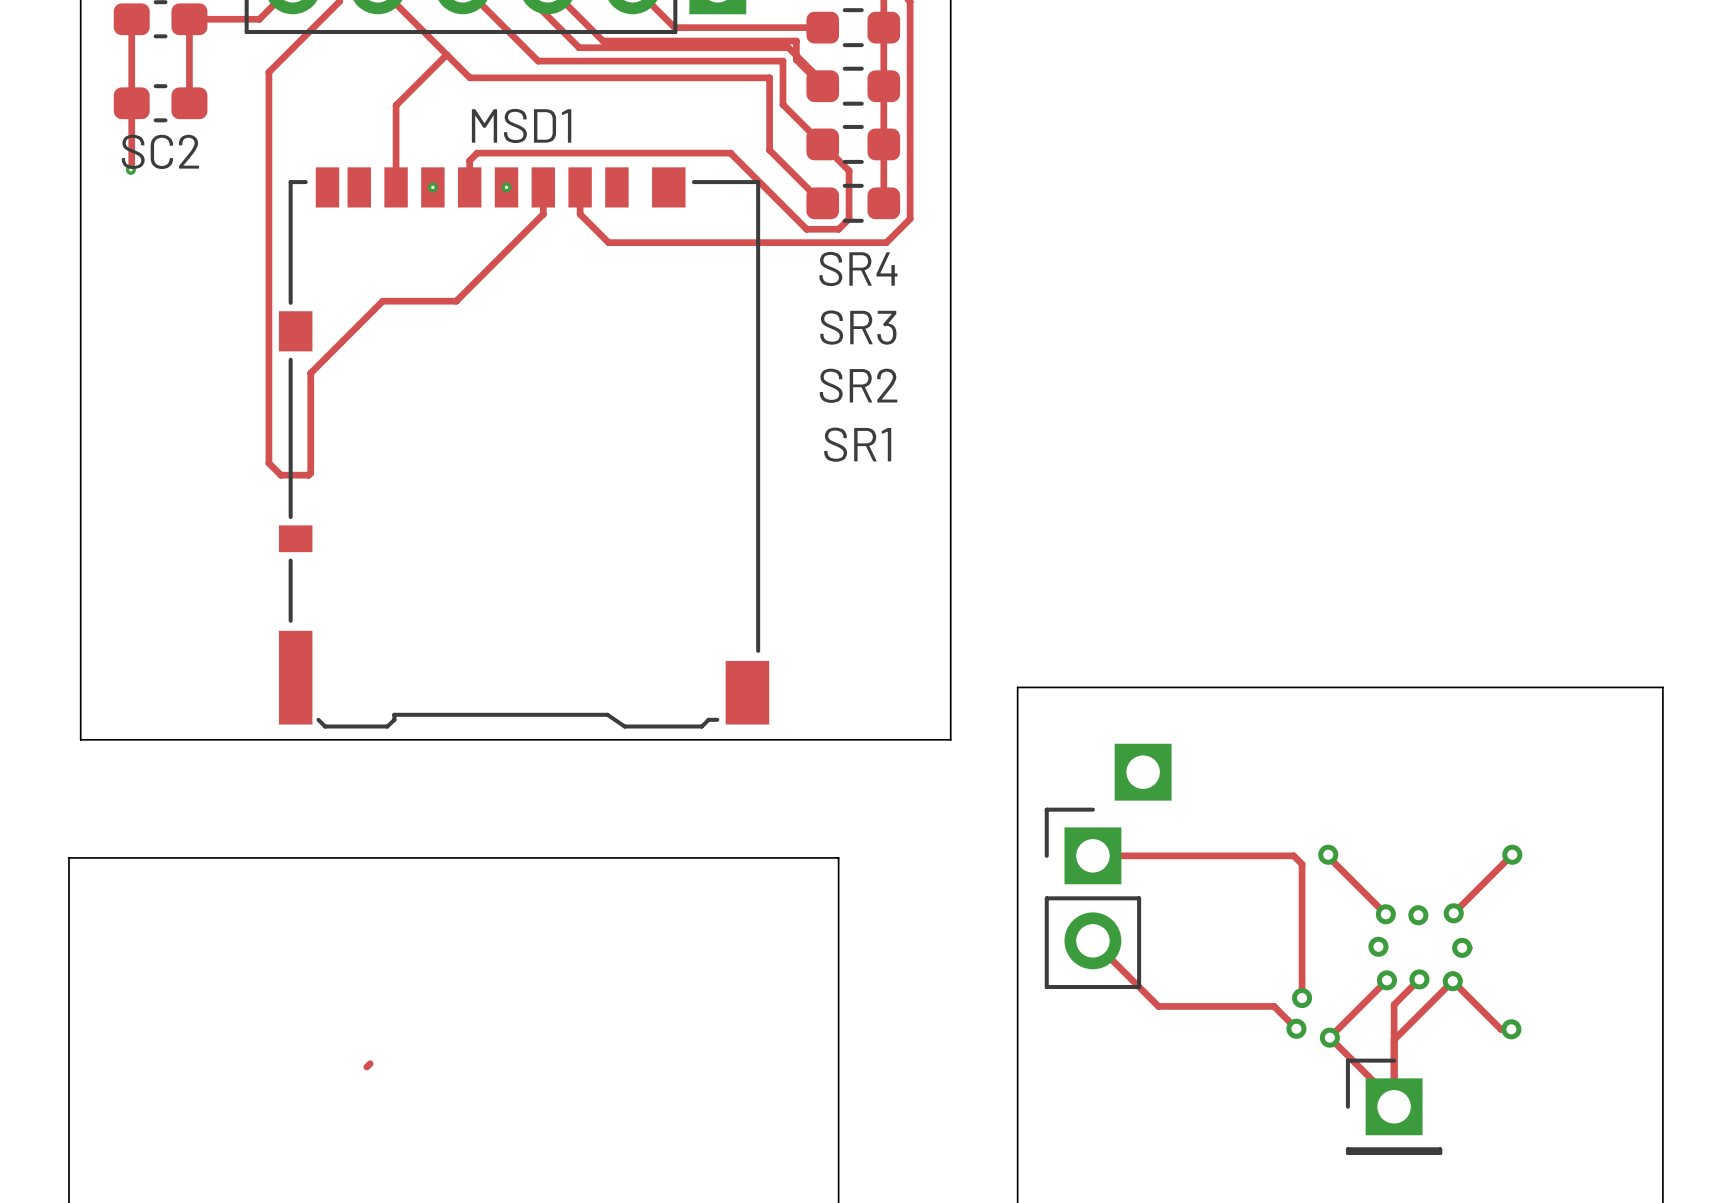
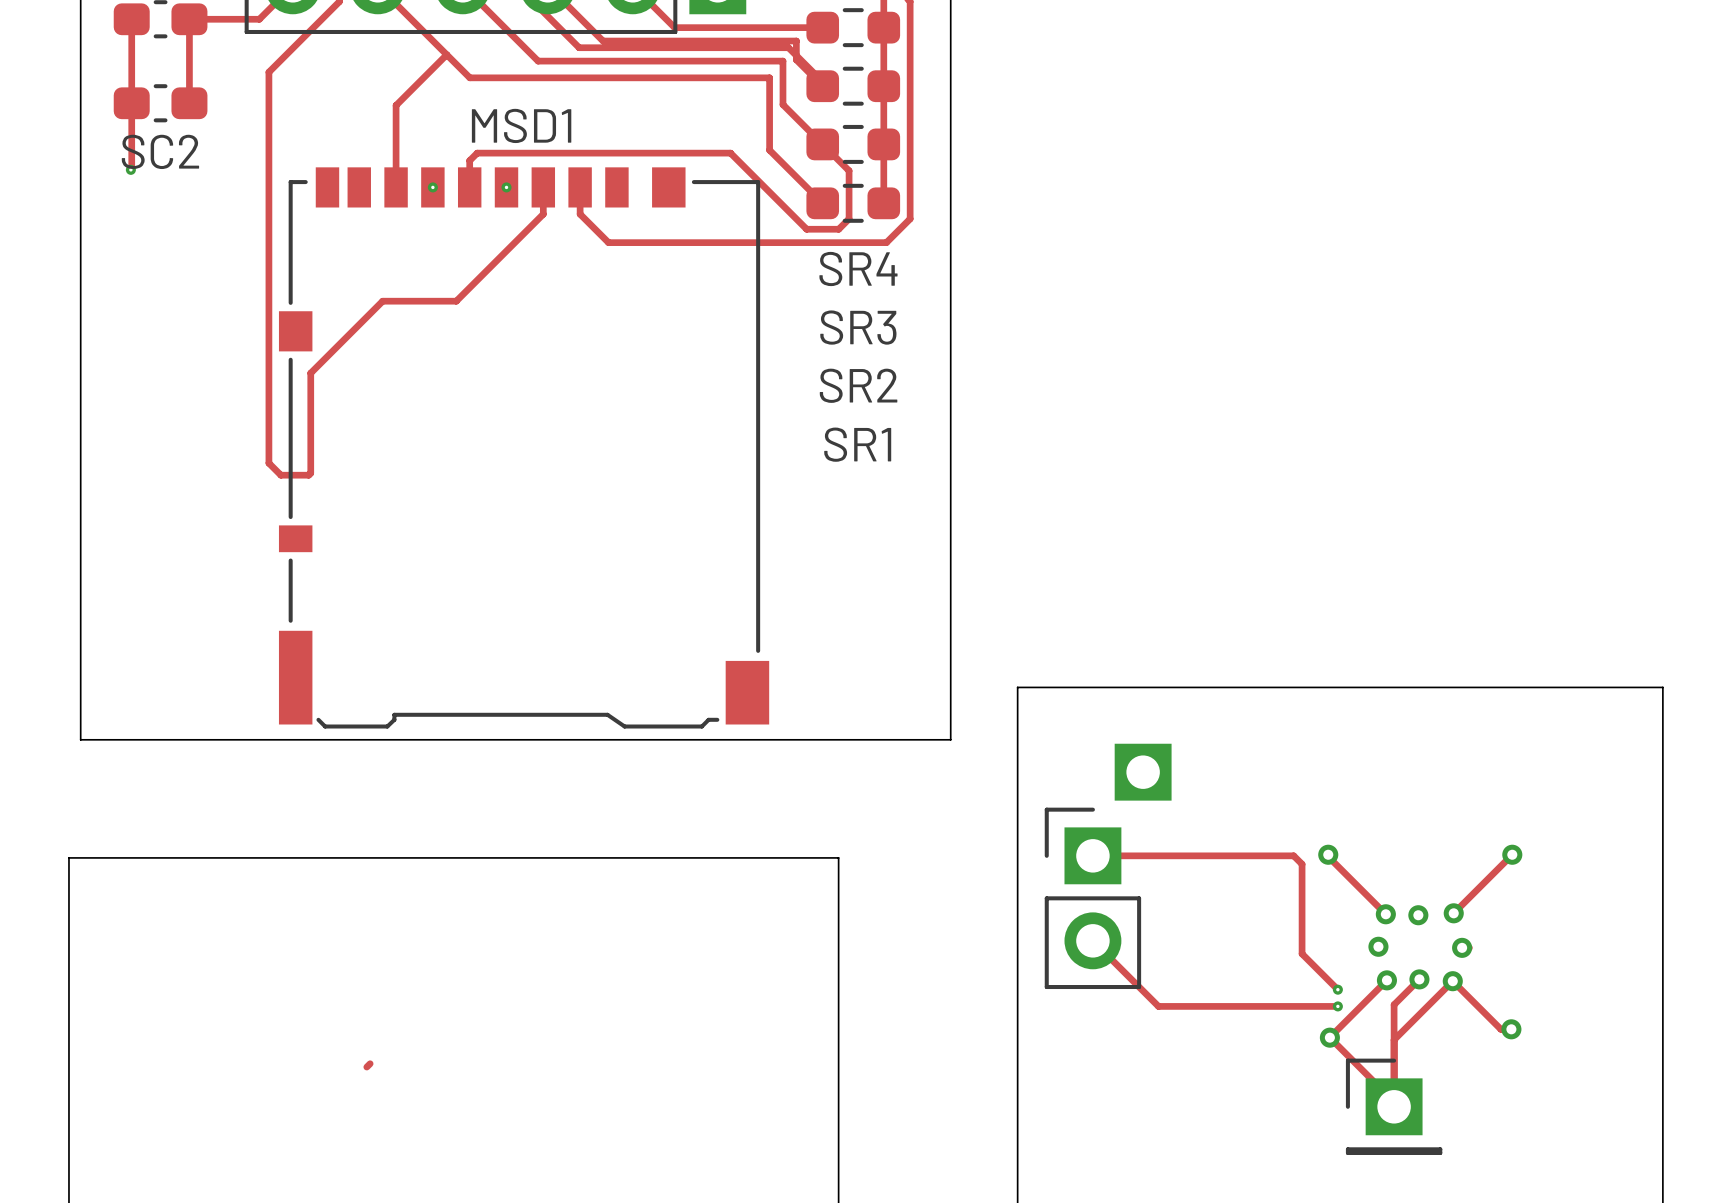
track: (1302, 953) (1302, 998) -> (1302, 953) (1337, 989)
via: none -> (1337, 989)
via: (1302, 998) -> none
track: (1274, 1006) (1296, 1028) -> (1274, 1006) (1337, 1006)
via: none -> (1337, 1006)
via: (1296, 1028) -> none

